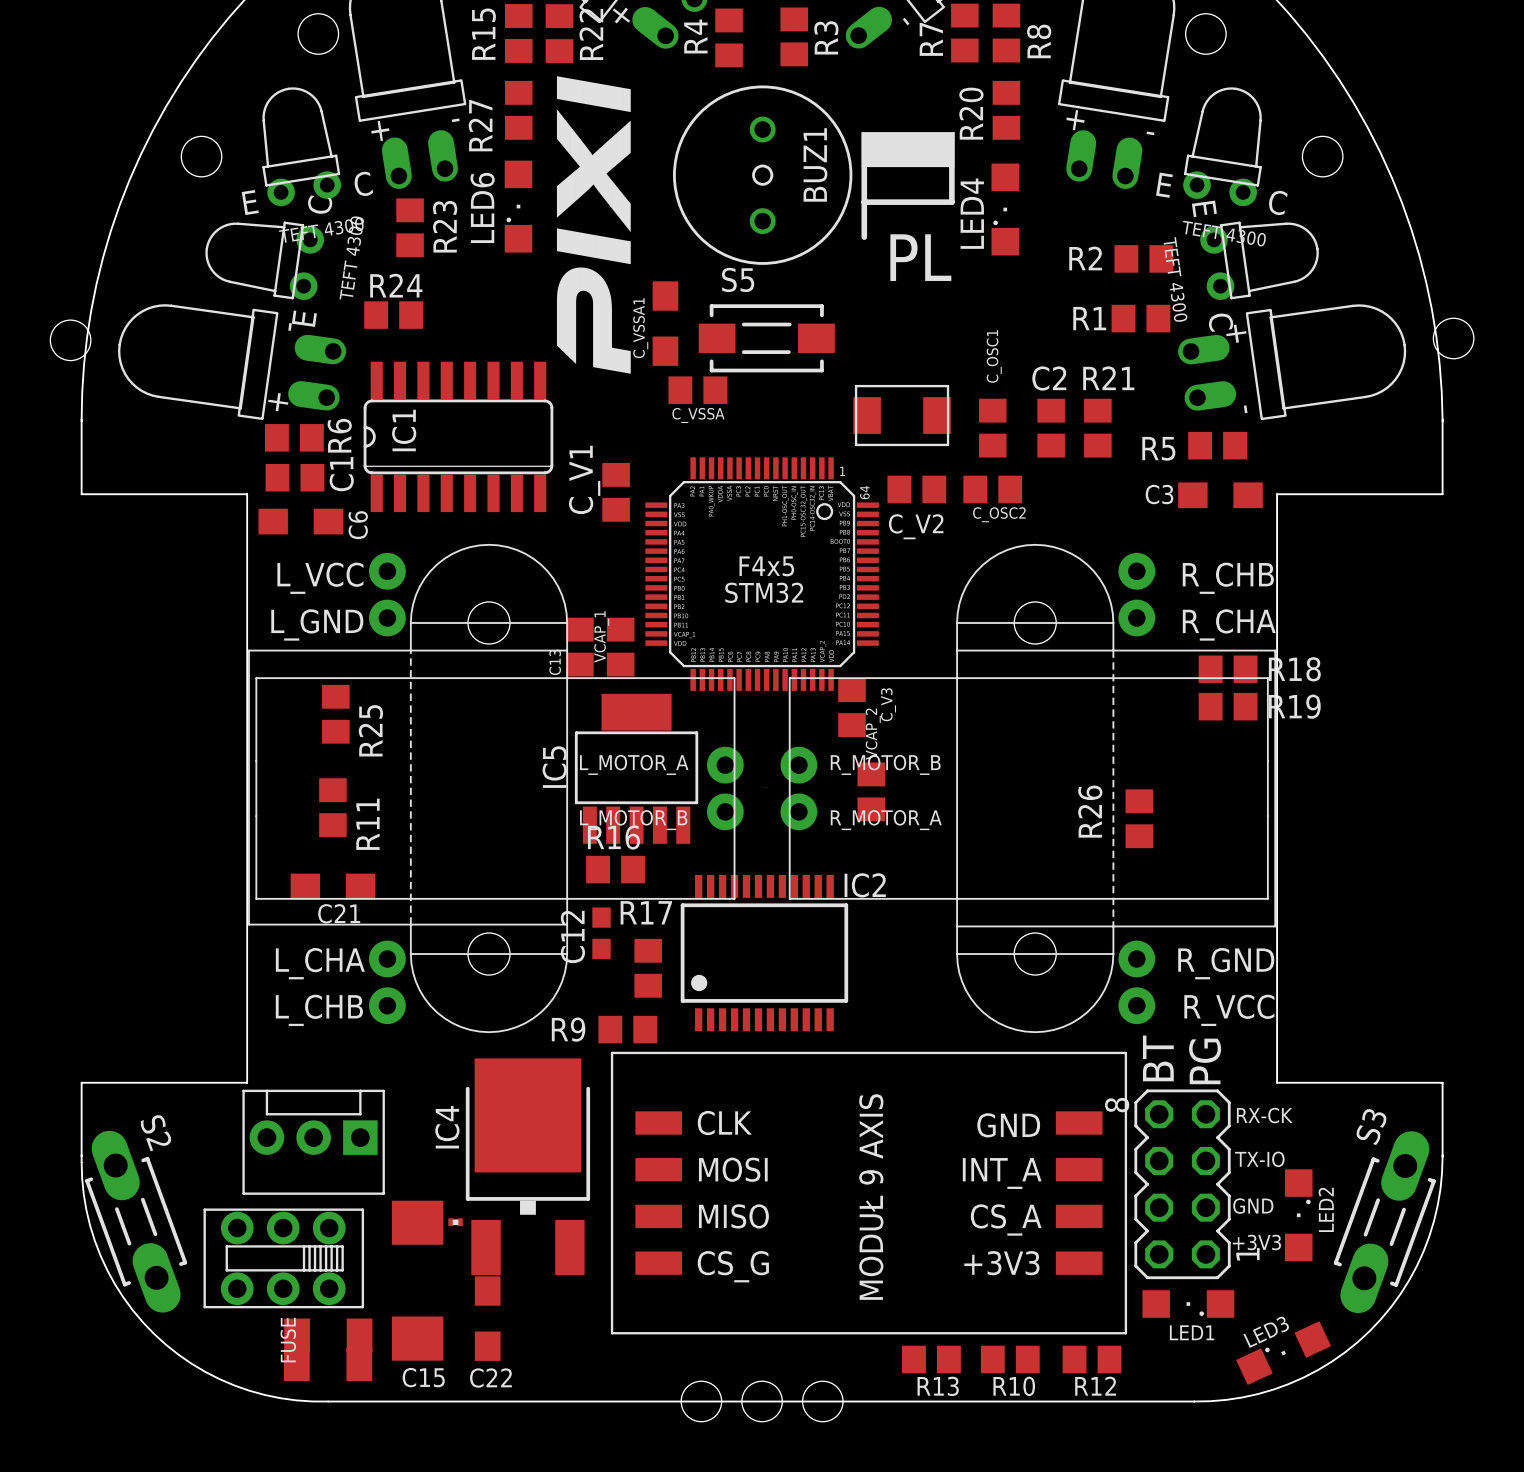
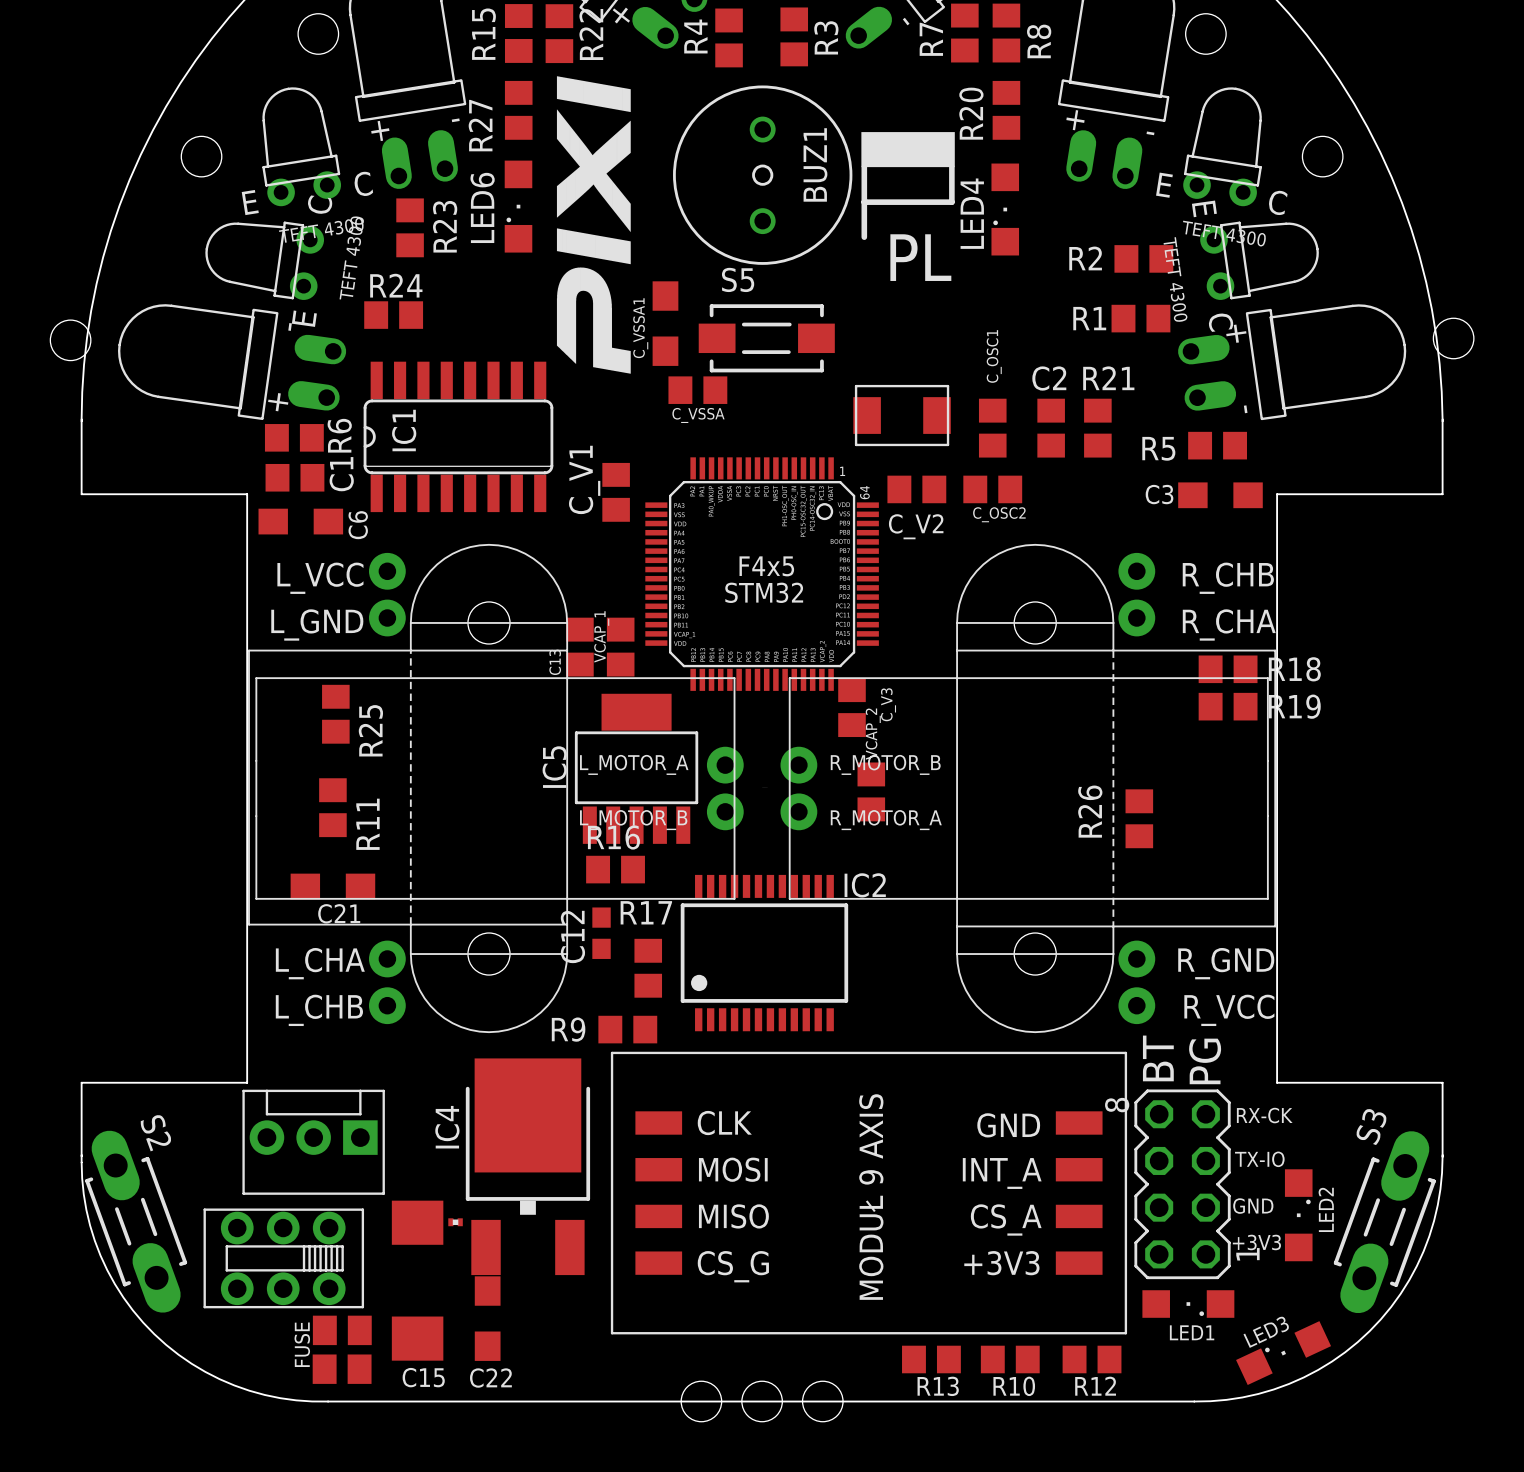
part footprint: [284, 1318, 373, 1352] -> [312, 1315, 372, 1346]
FUSE footprint: [283, 1347, 373, 1382] -> [312, 1354, 372, 1384]

